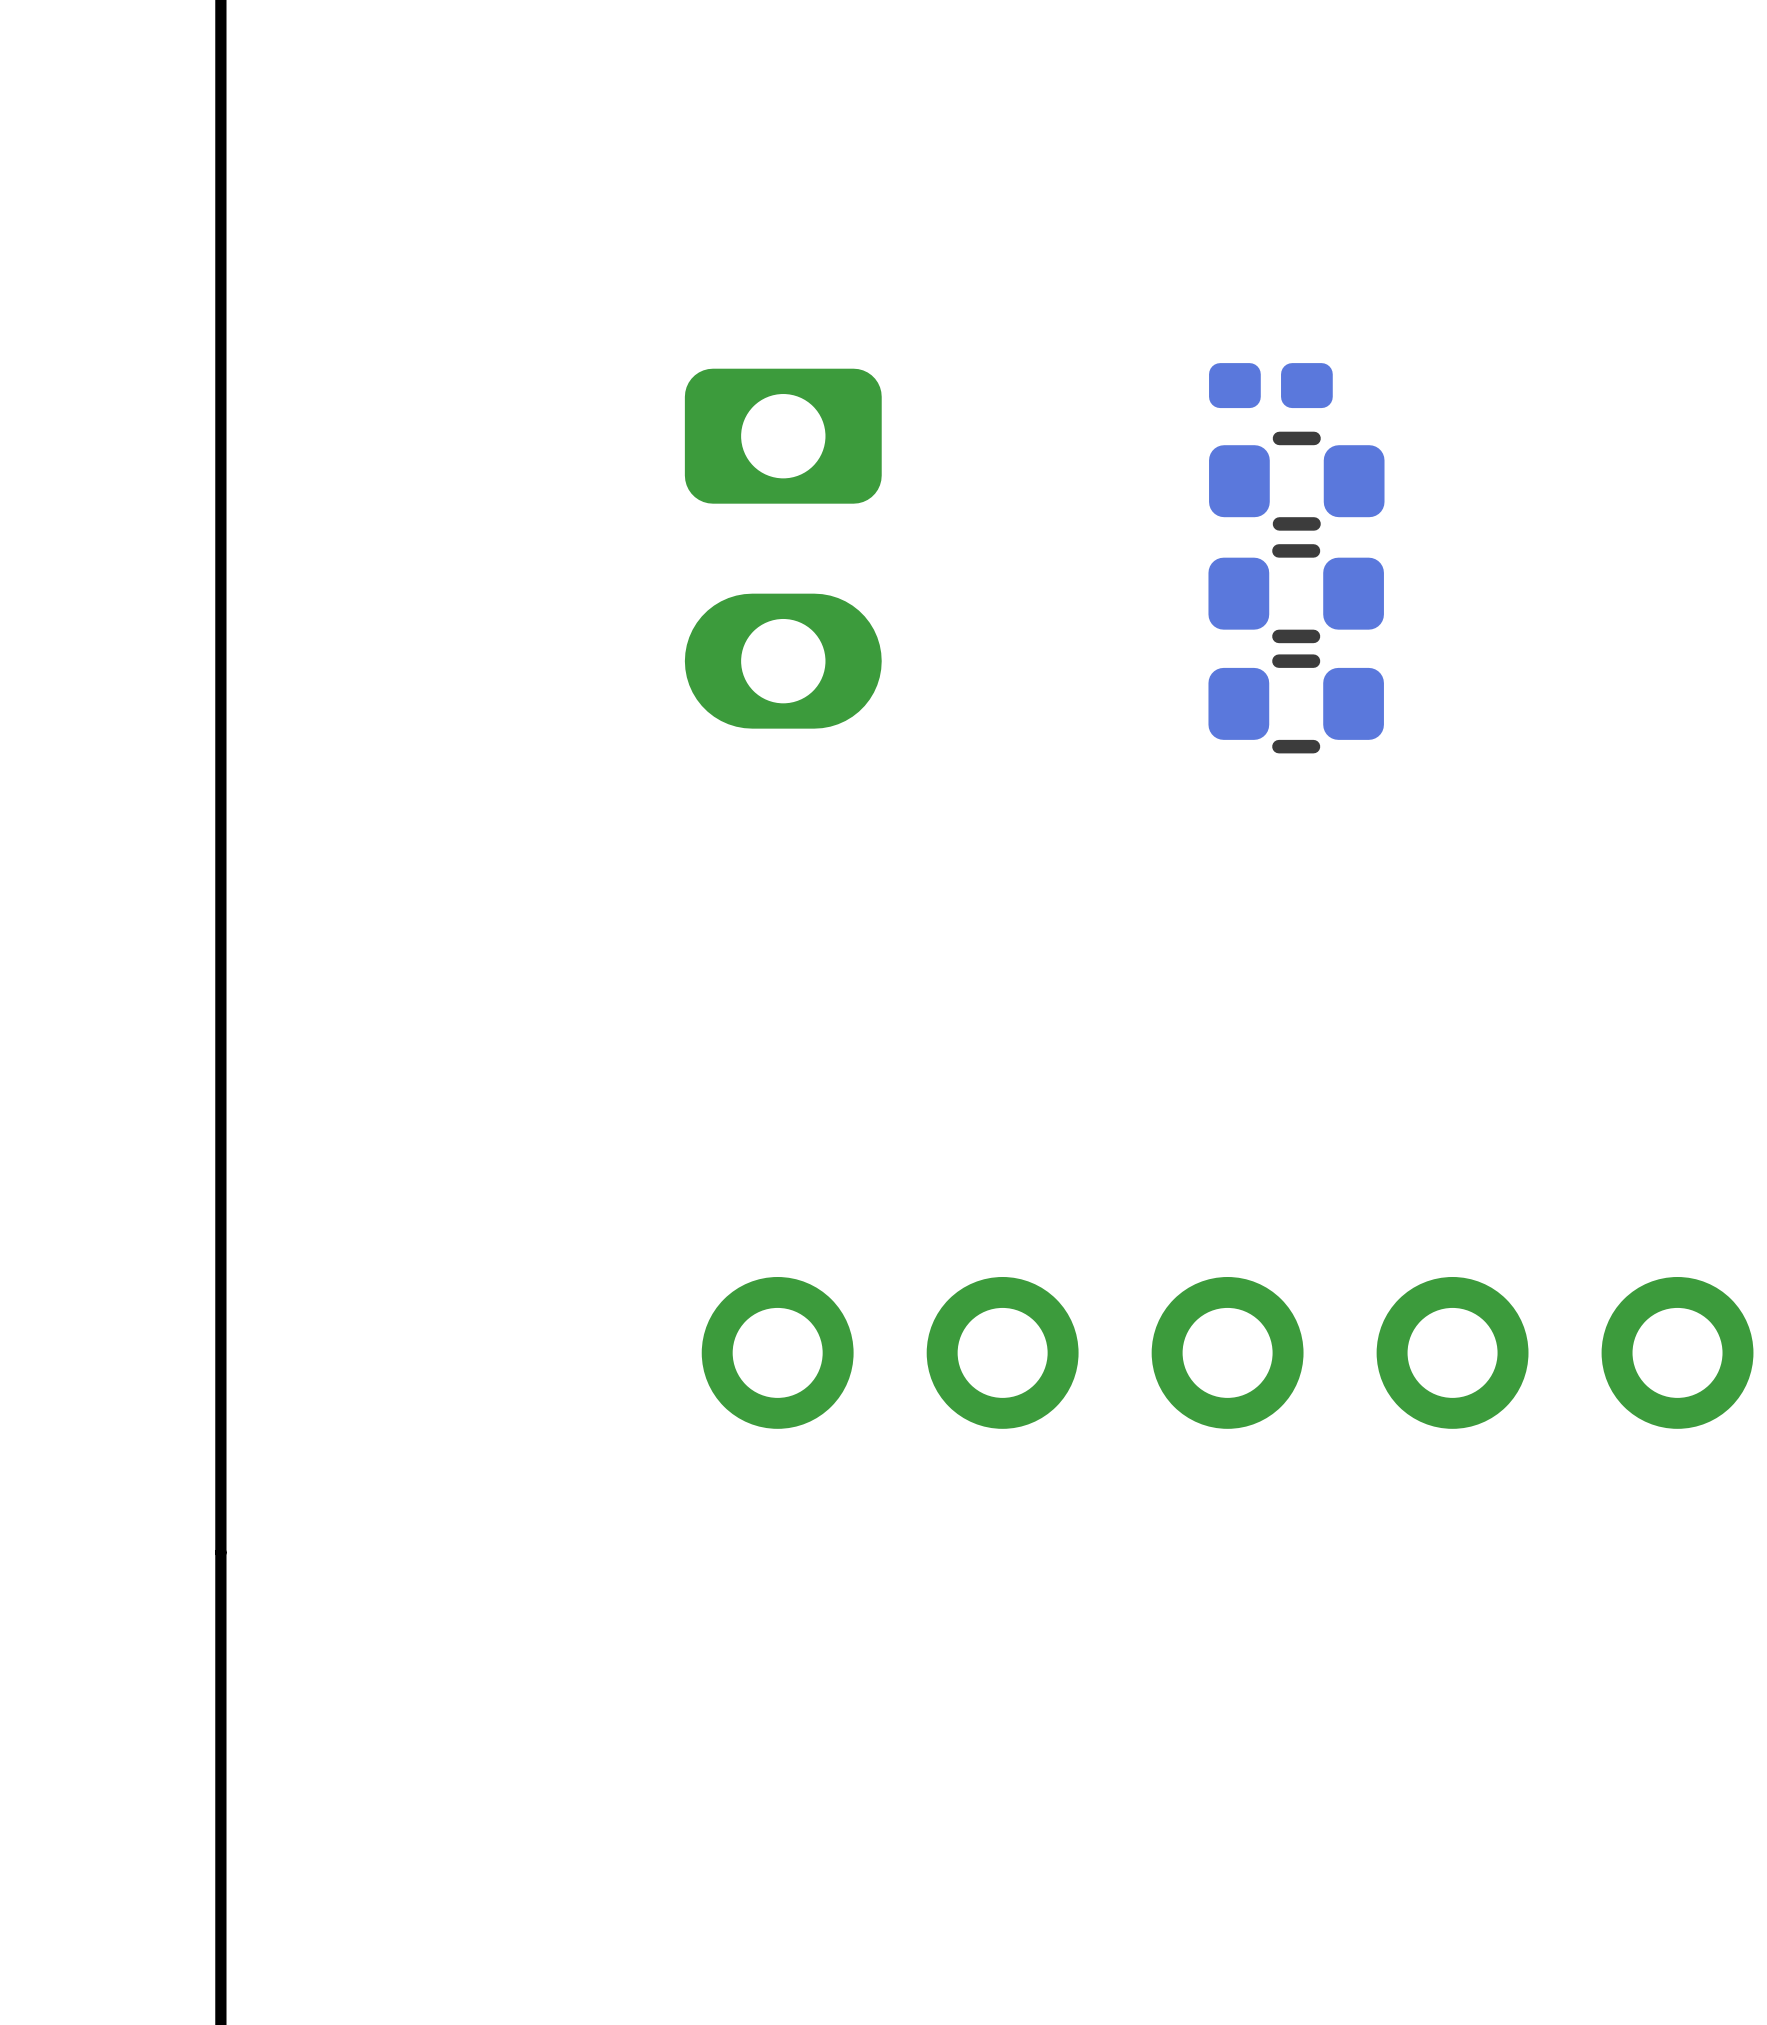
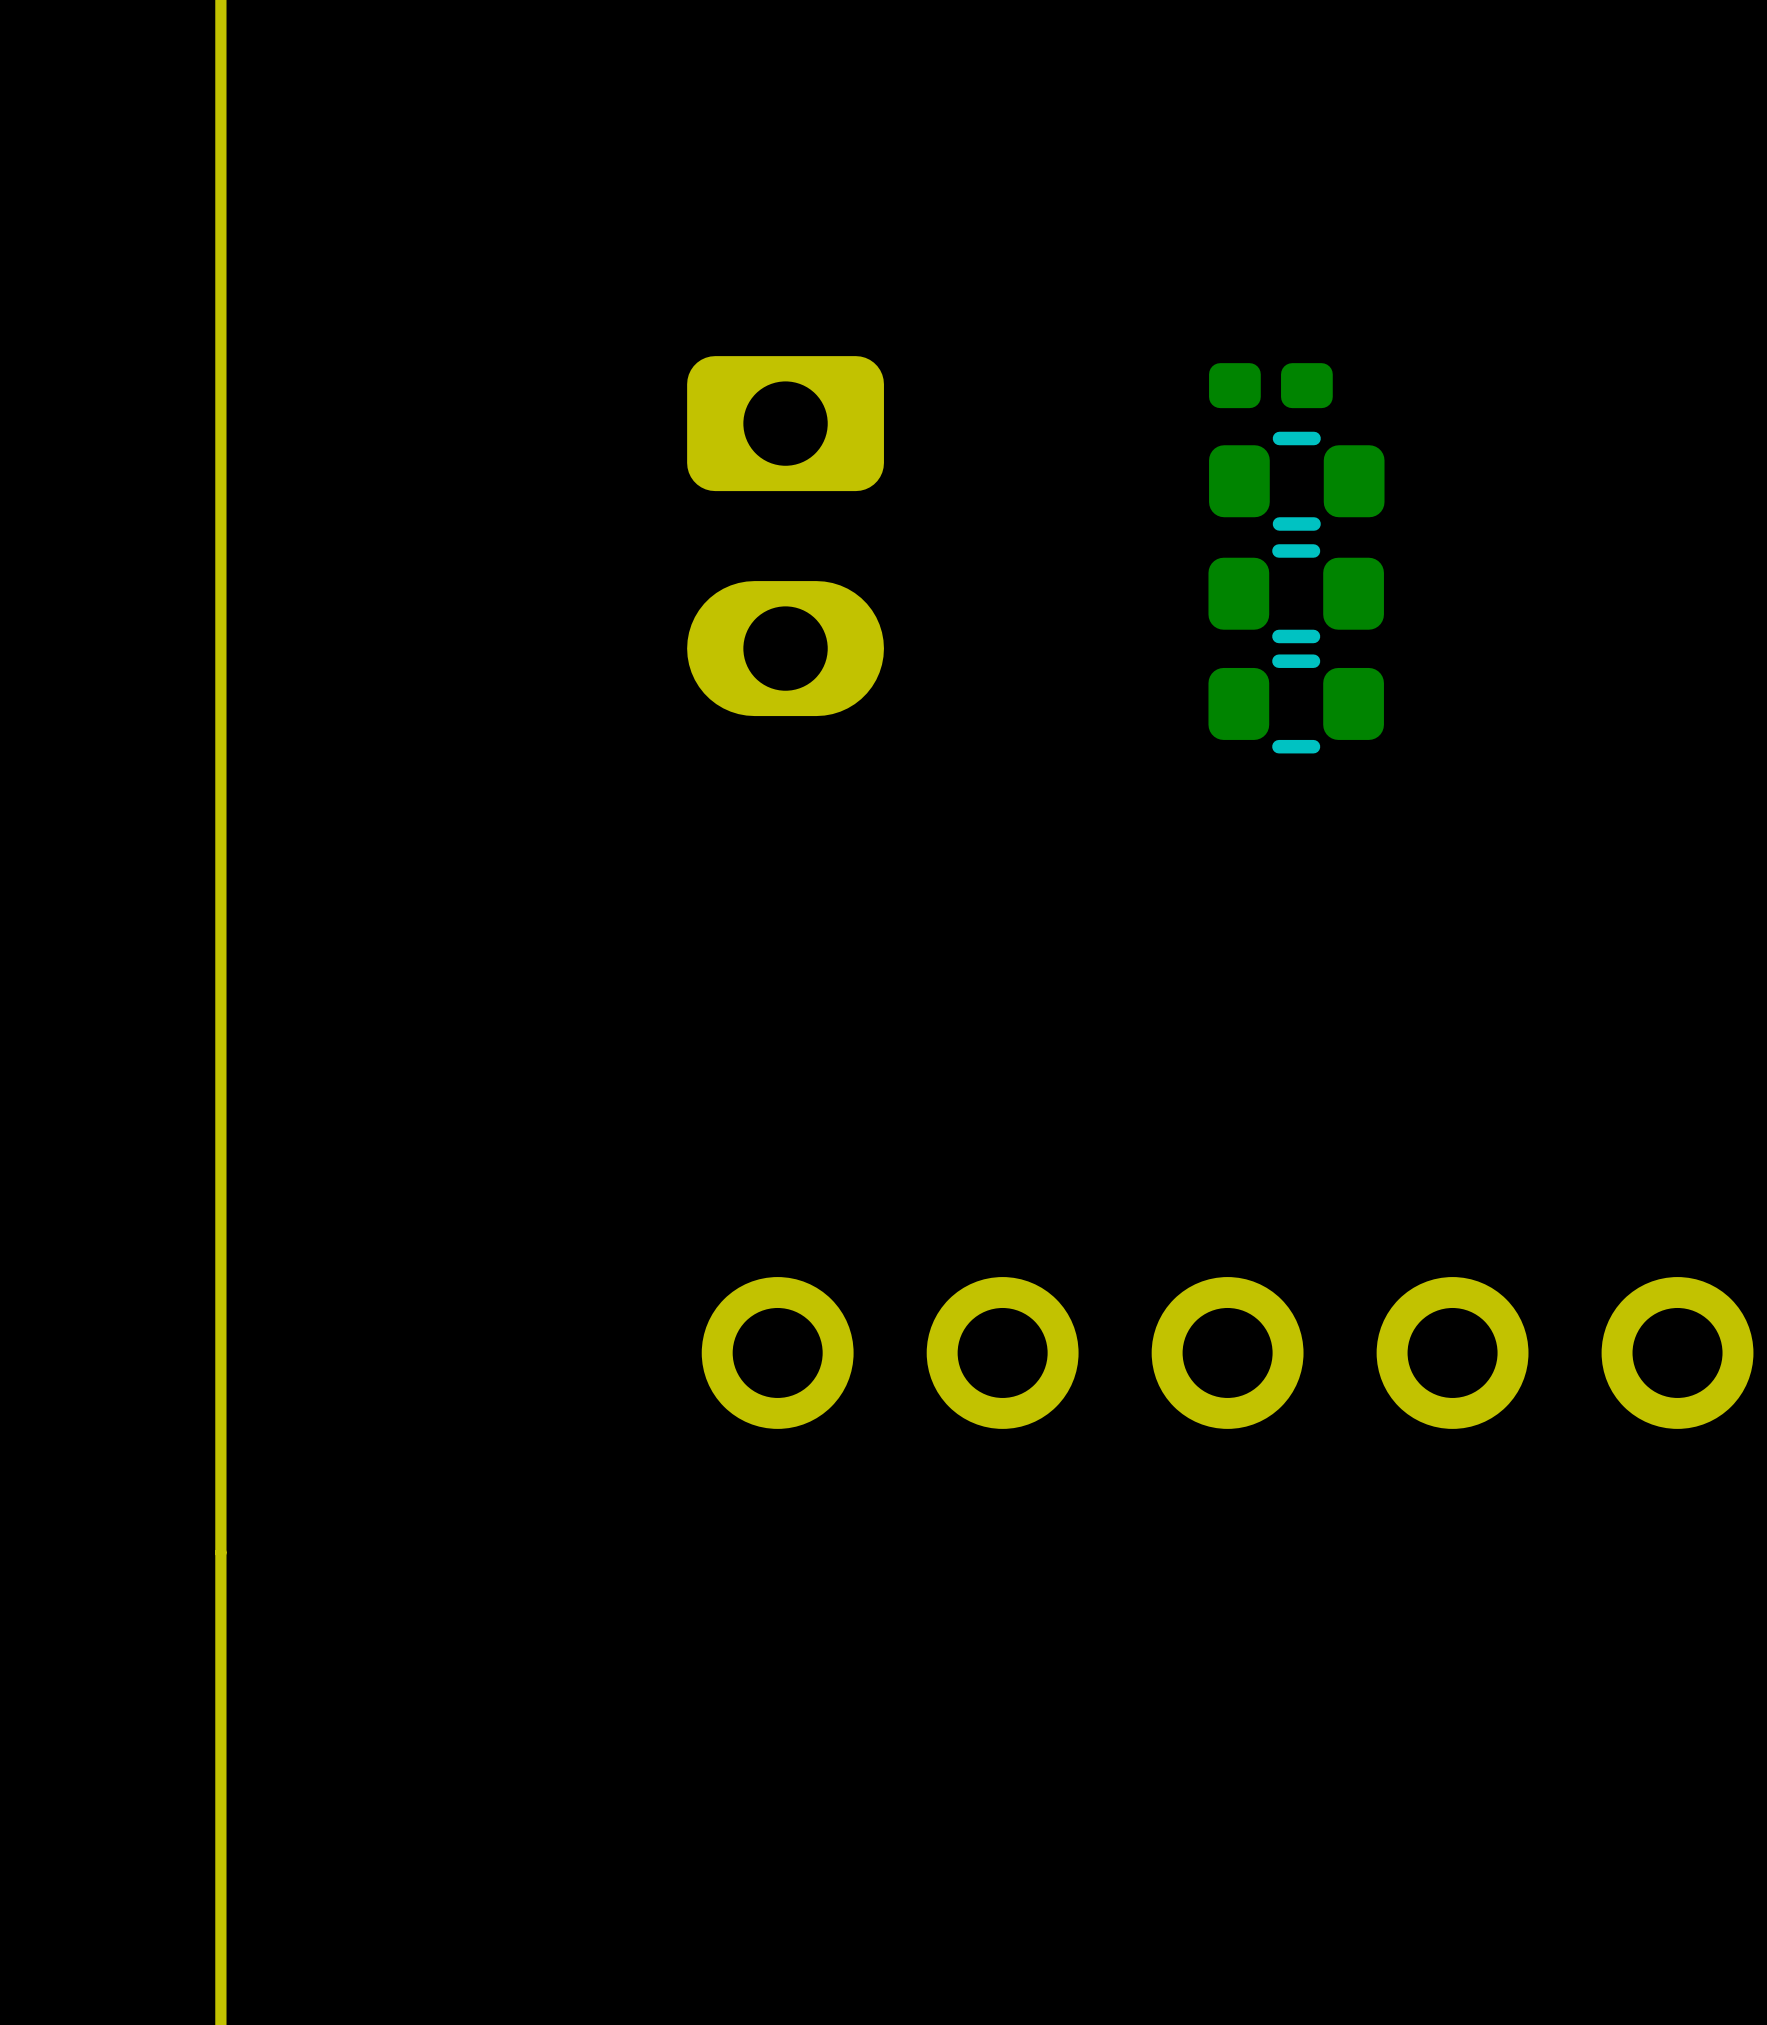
part position: (783, 548) -> (785, 536)

